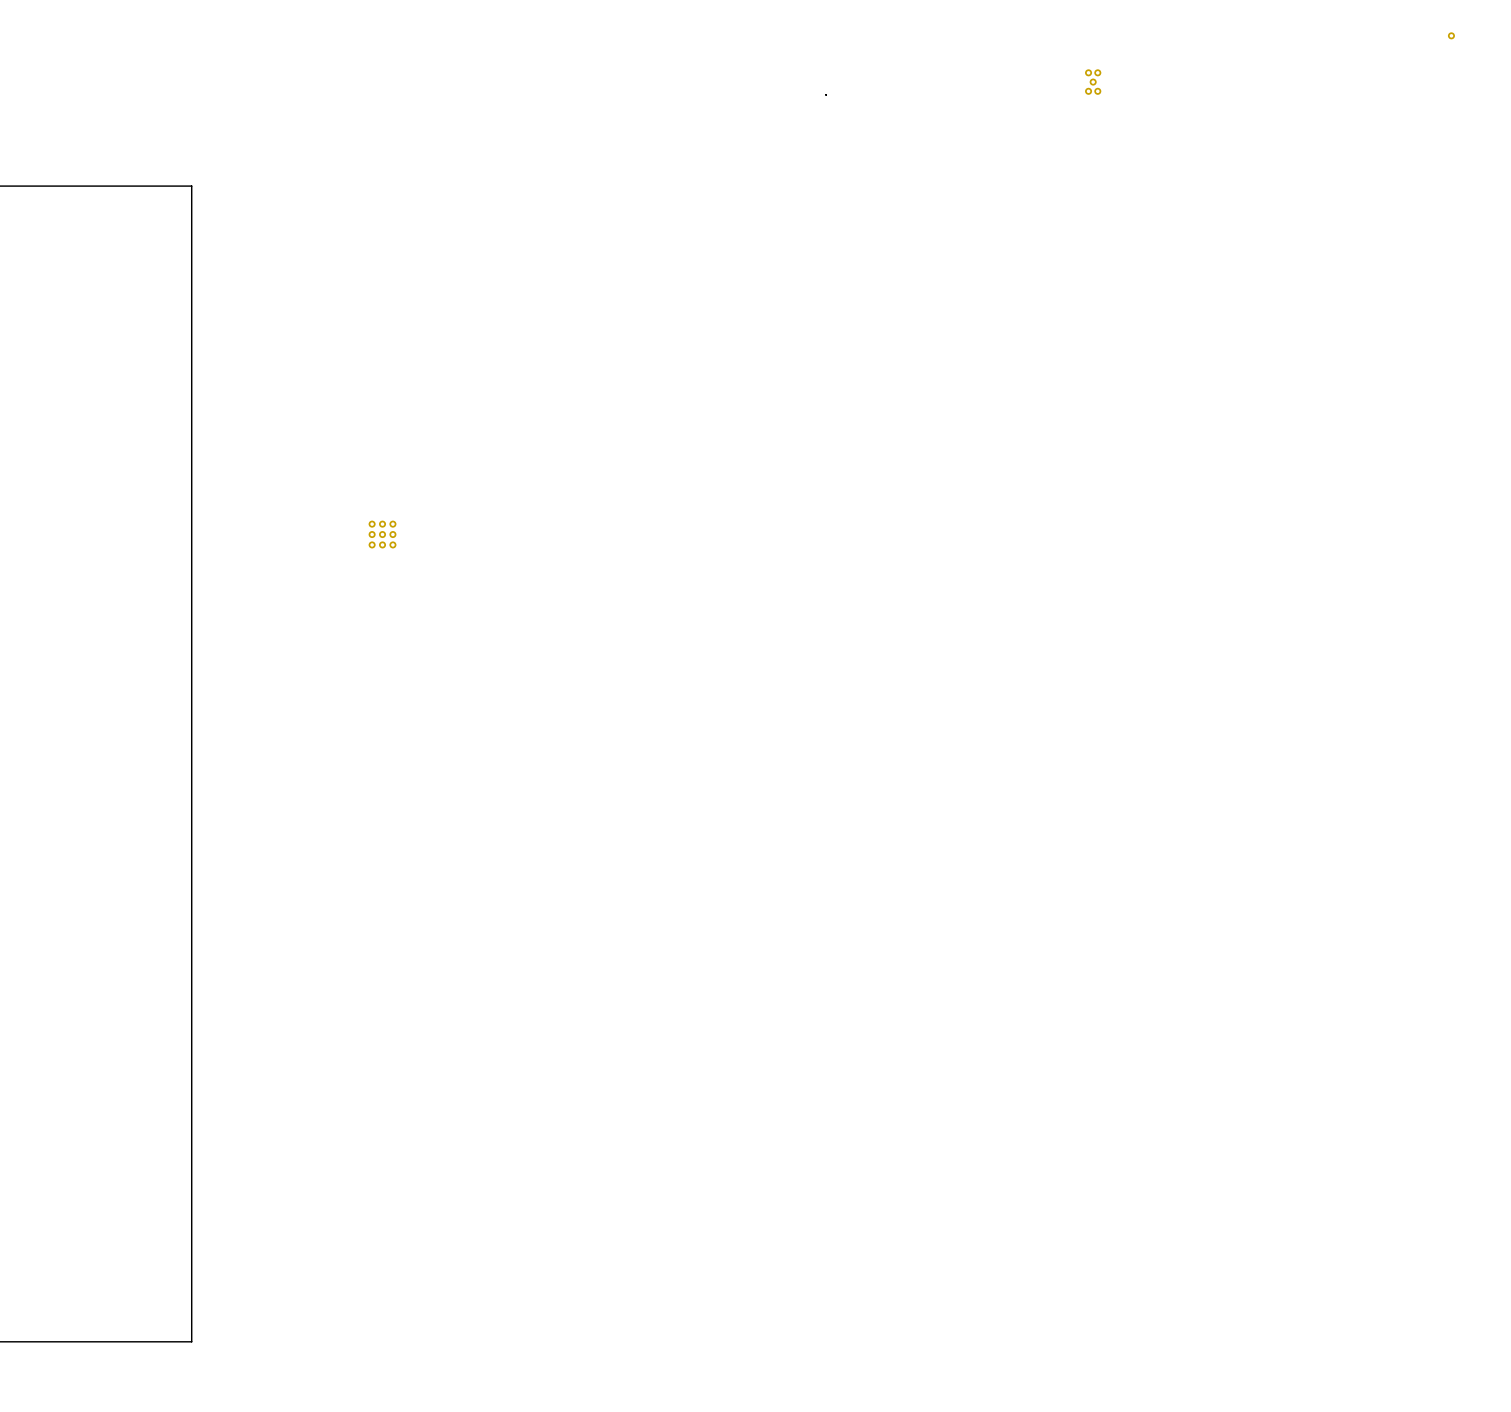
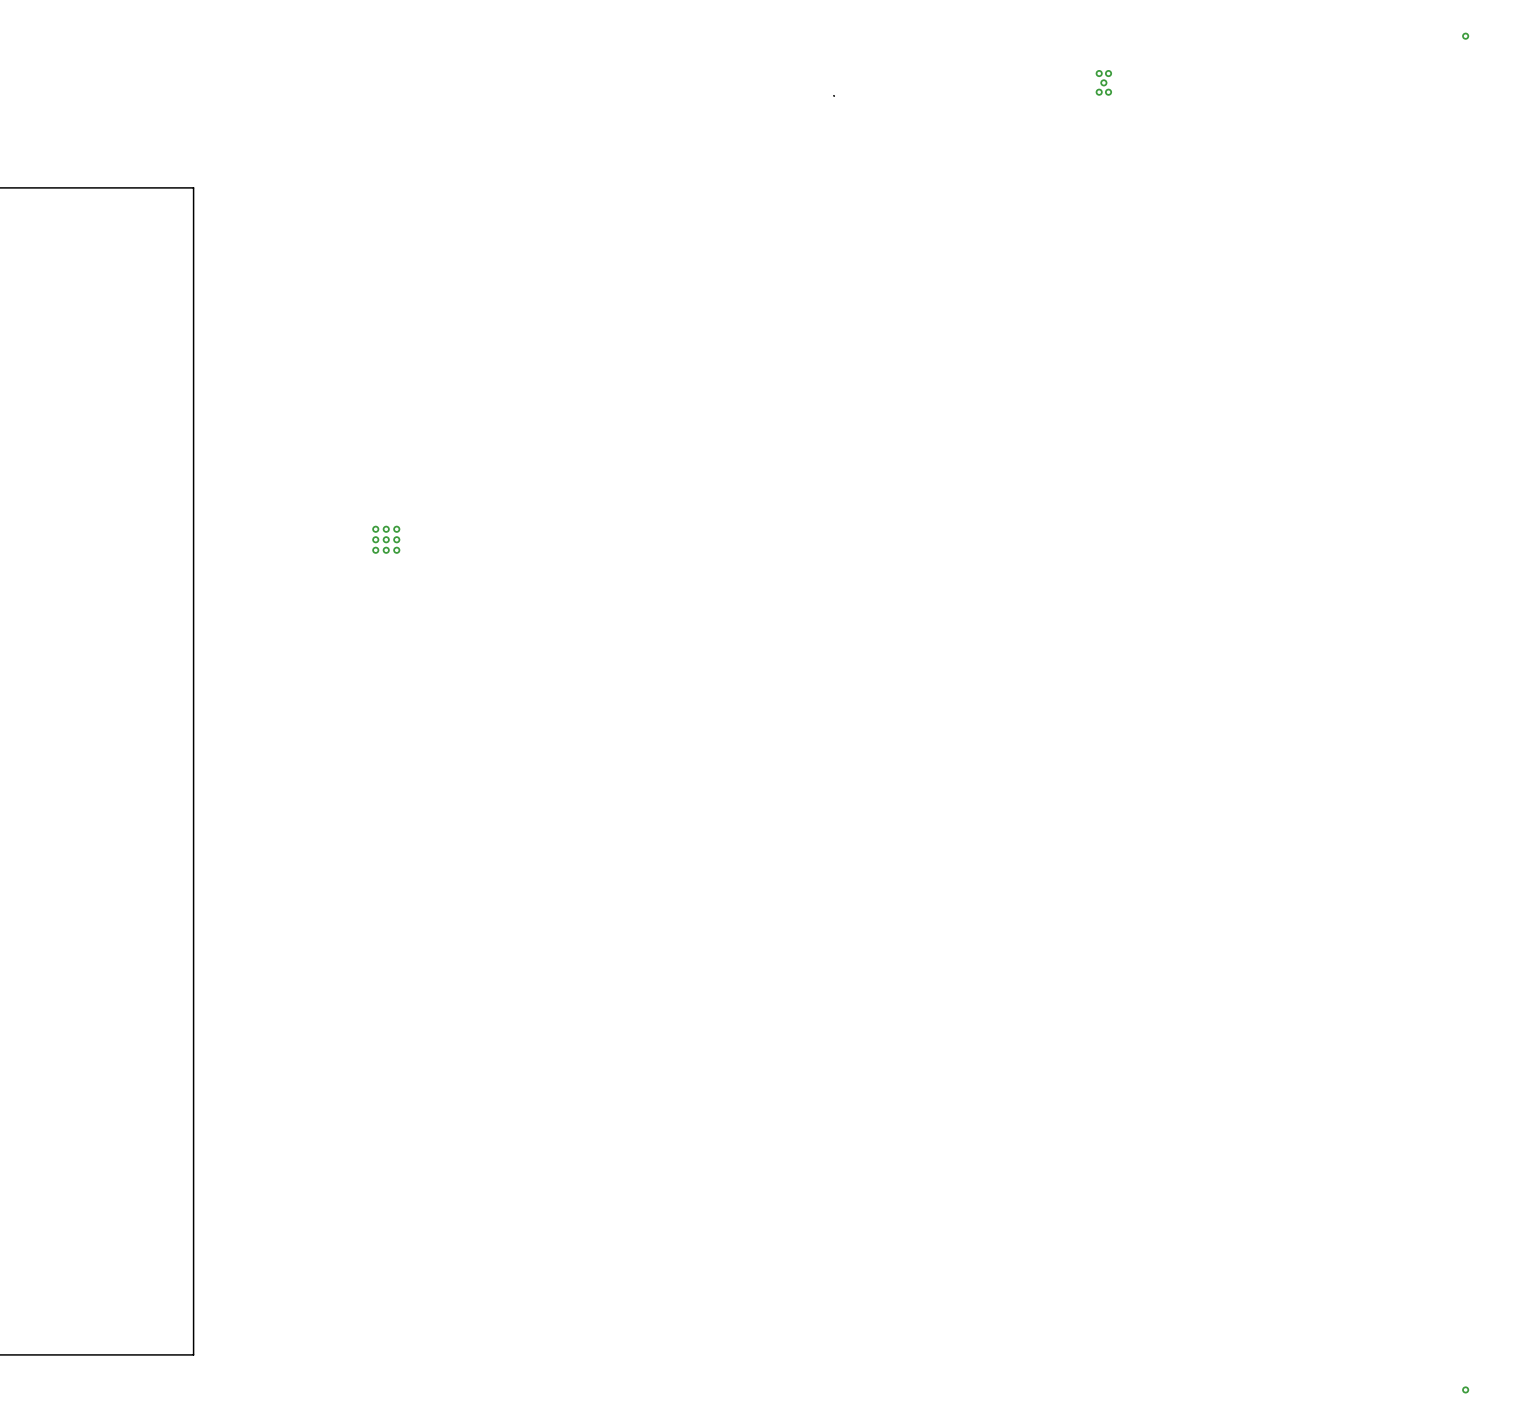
part: none -> (1465, 1389)

